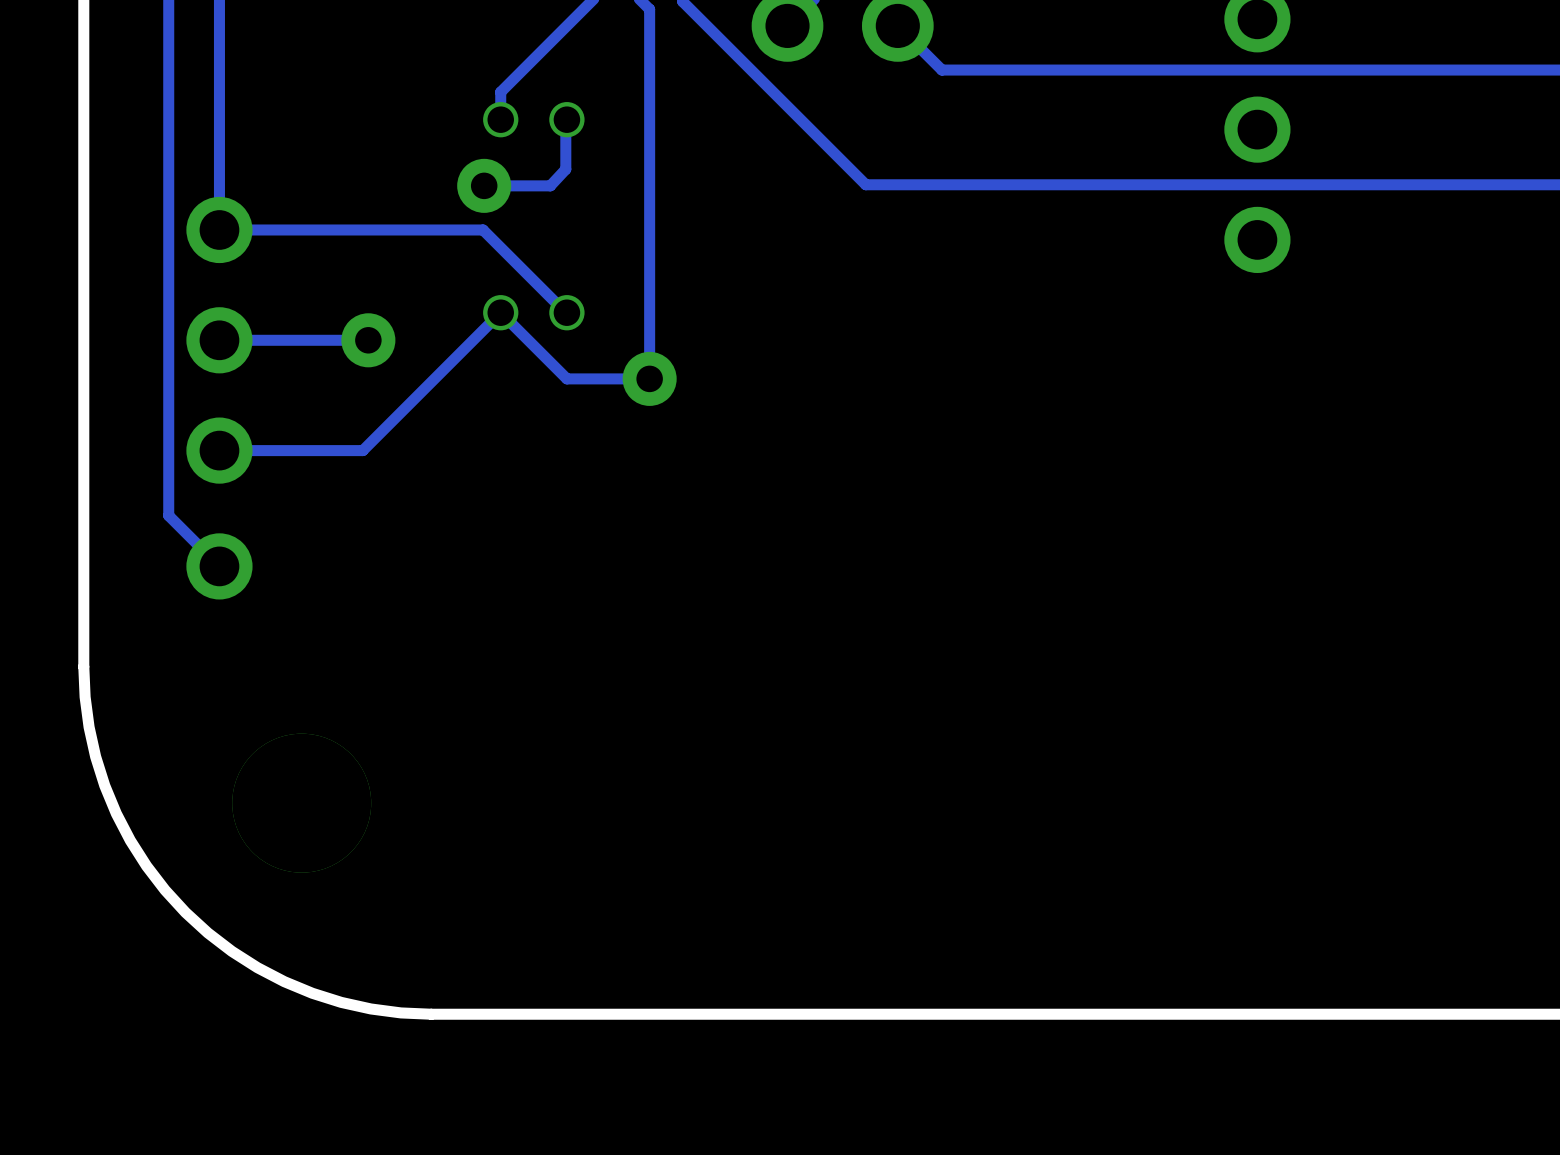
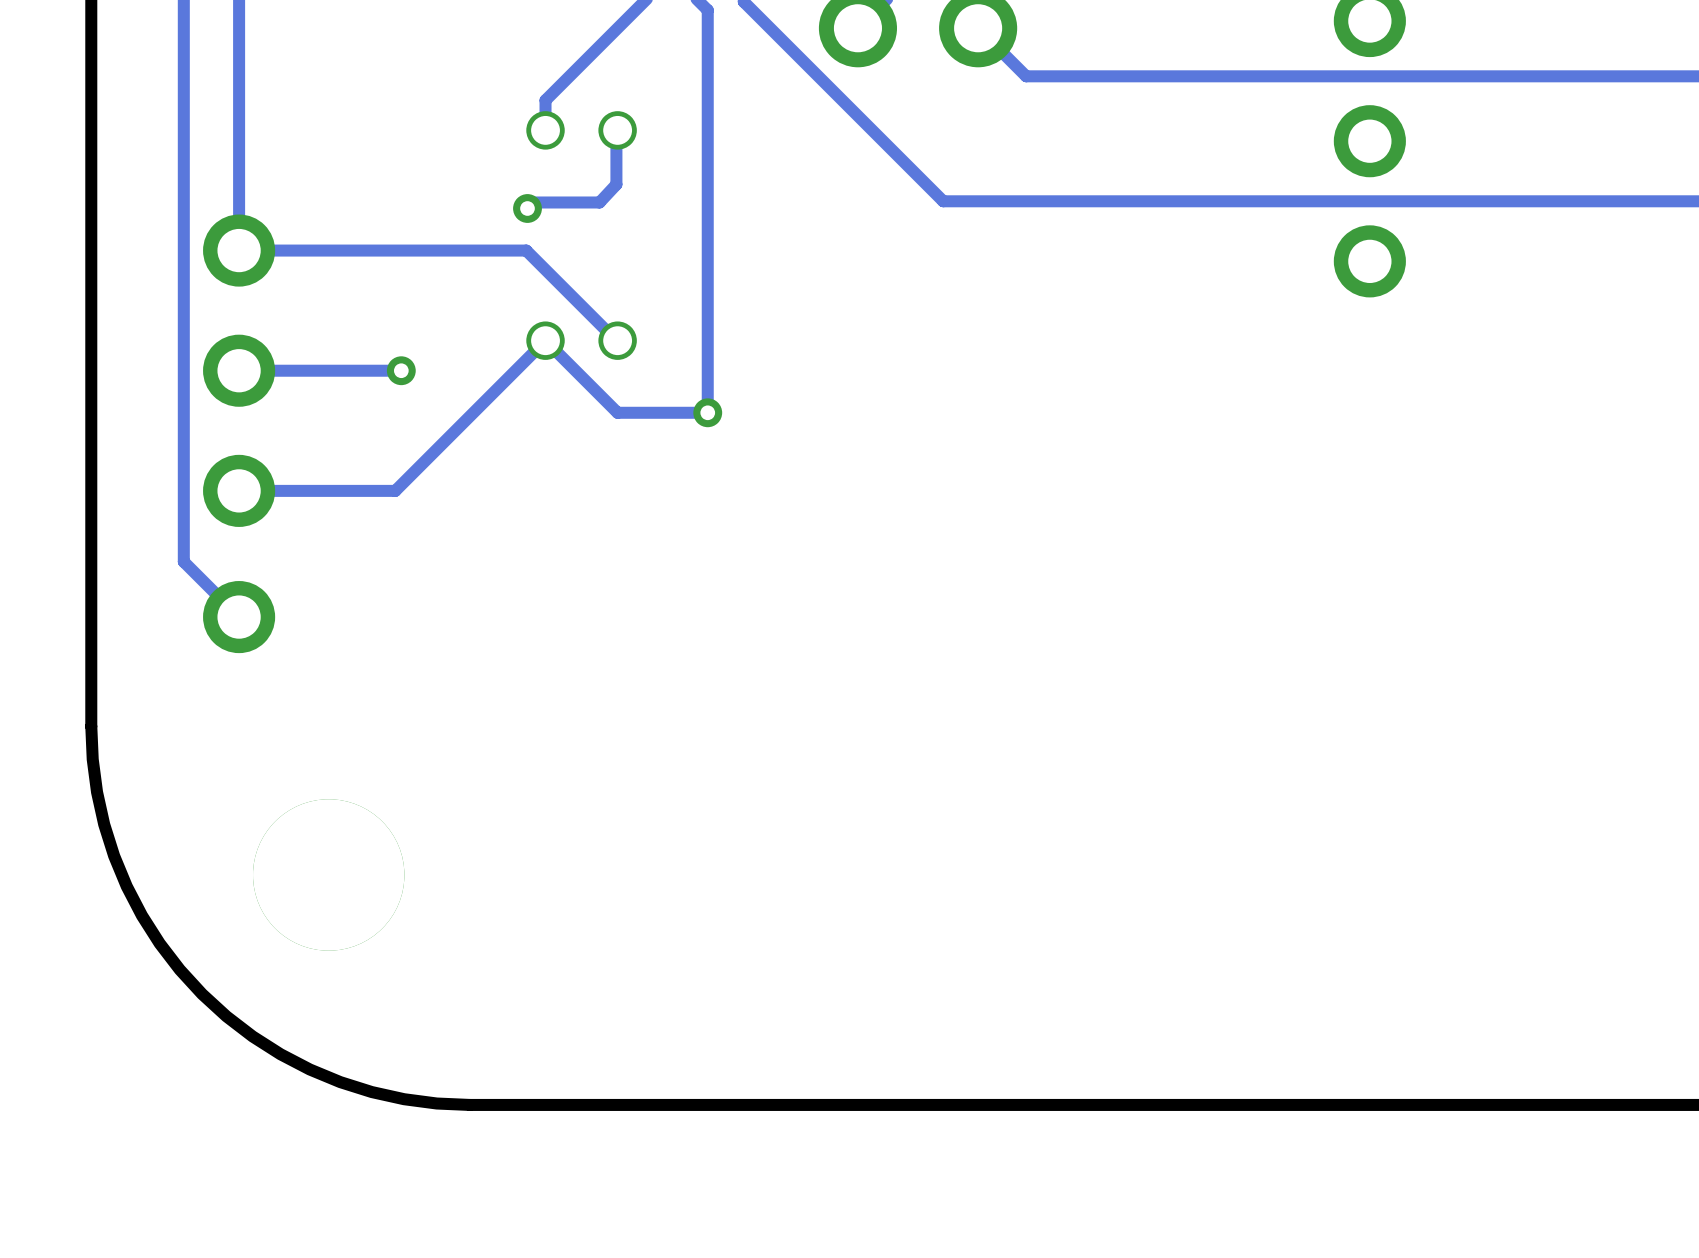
via size: [457, 158, 512, 213] -> [513, 194, 542, 223]
via size: [341, 313, 396, 368] -> [386, 356, 416, 386]
via size: [622, 351, 677, 406] -> [693, 398, 723, 428]

